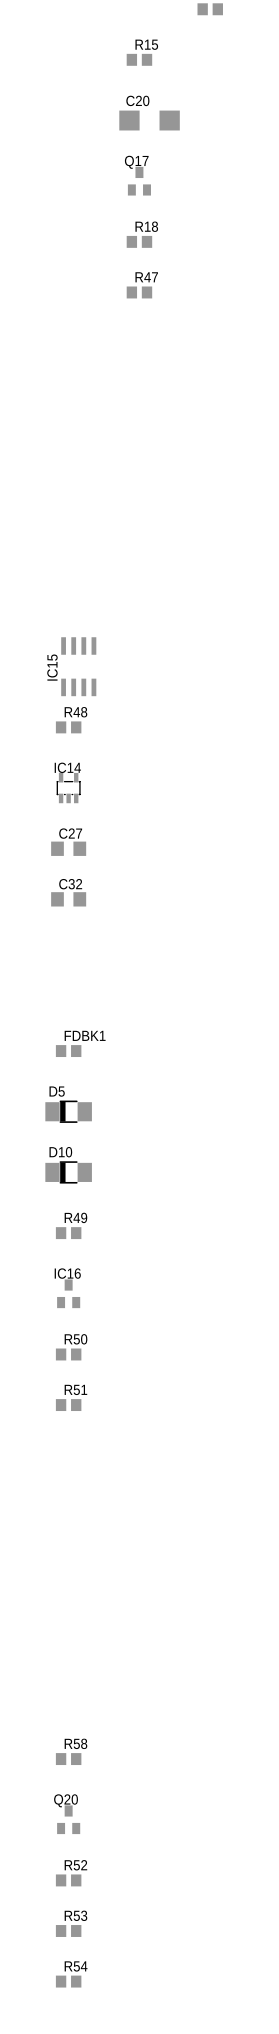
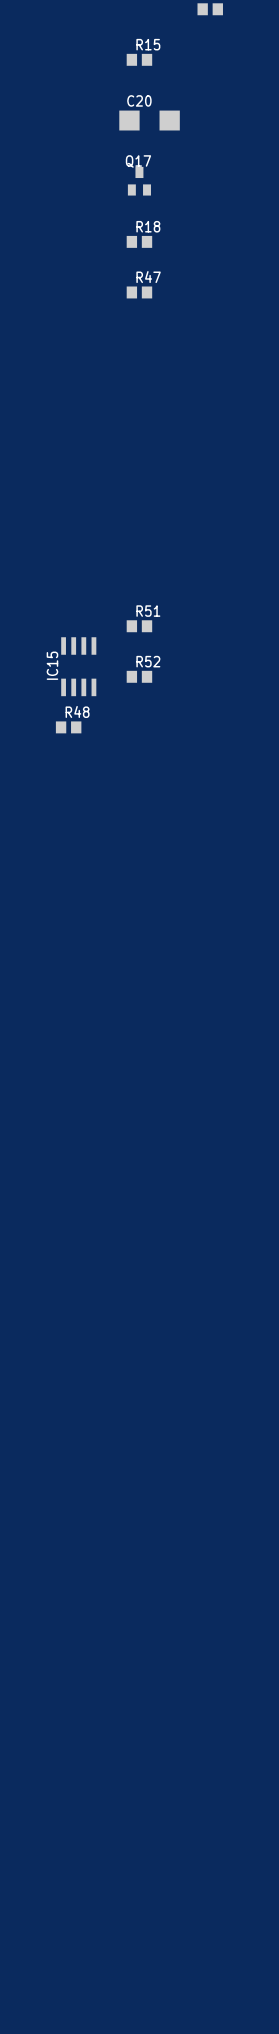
IC14: (68, 788) -> none
C27: (68, 848) -> none
C32: (68, 899) -> none
FDBK1: (68, 1051) -> none
D5: (68, 1111) -> none
D10: (68, 1172) -> none
R49: (68, 1233) -> none
IC16: (68, 1293) -> none
R50: (68, 1354) -> none
R51 position: (68, 1405) -> (139, 626)
R58: (68, 1759) -> none
Q20: (68, 1819) -> none
R52 position: (68, 1880) -> (139, 676)
R53: (68, 1931) -> none
R54: (68, 1981) -> none

